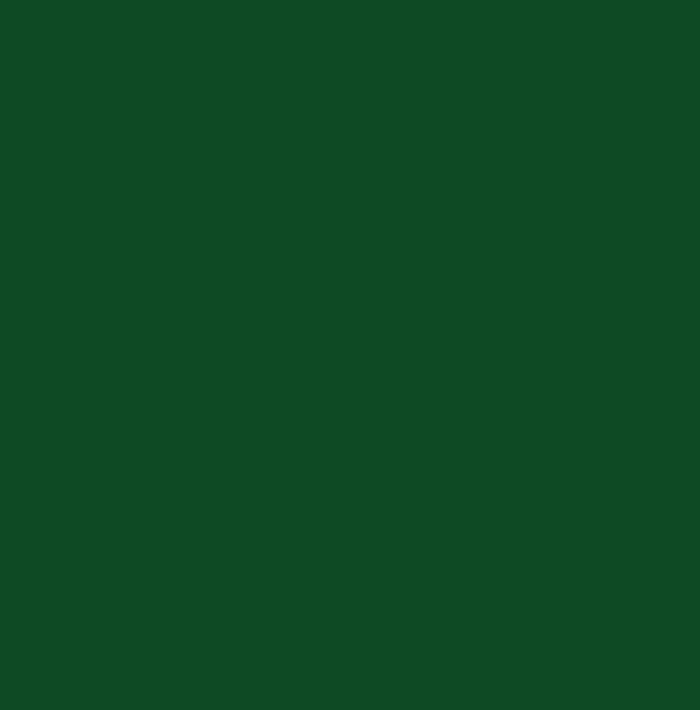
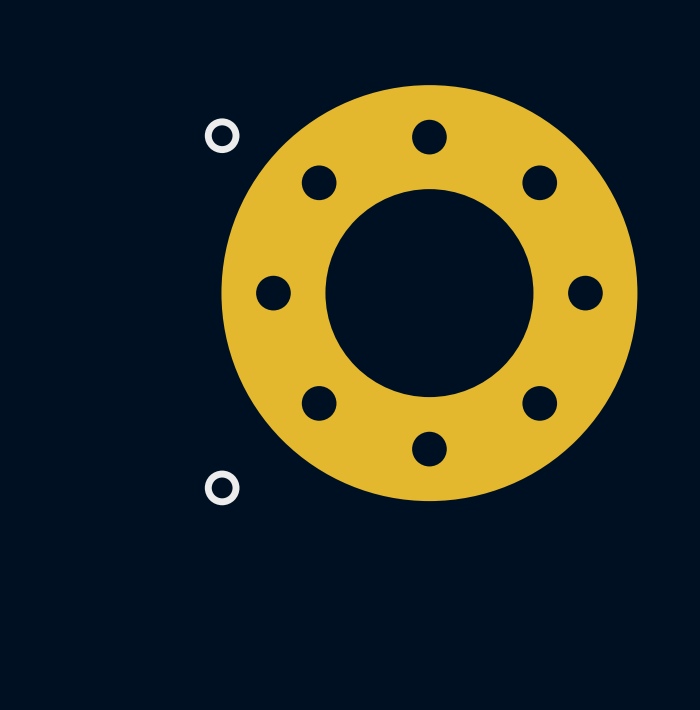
via: none -> (222, 135)
part: none -> (429, 293)
via: none -> (222, 487)

